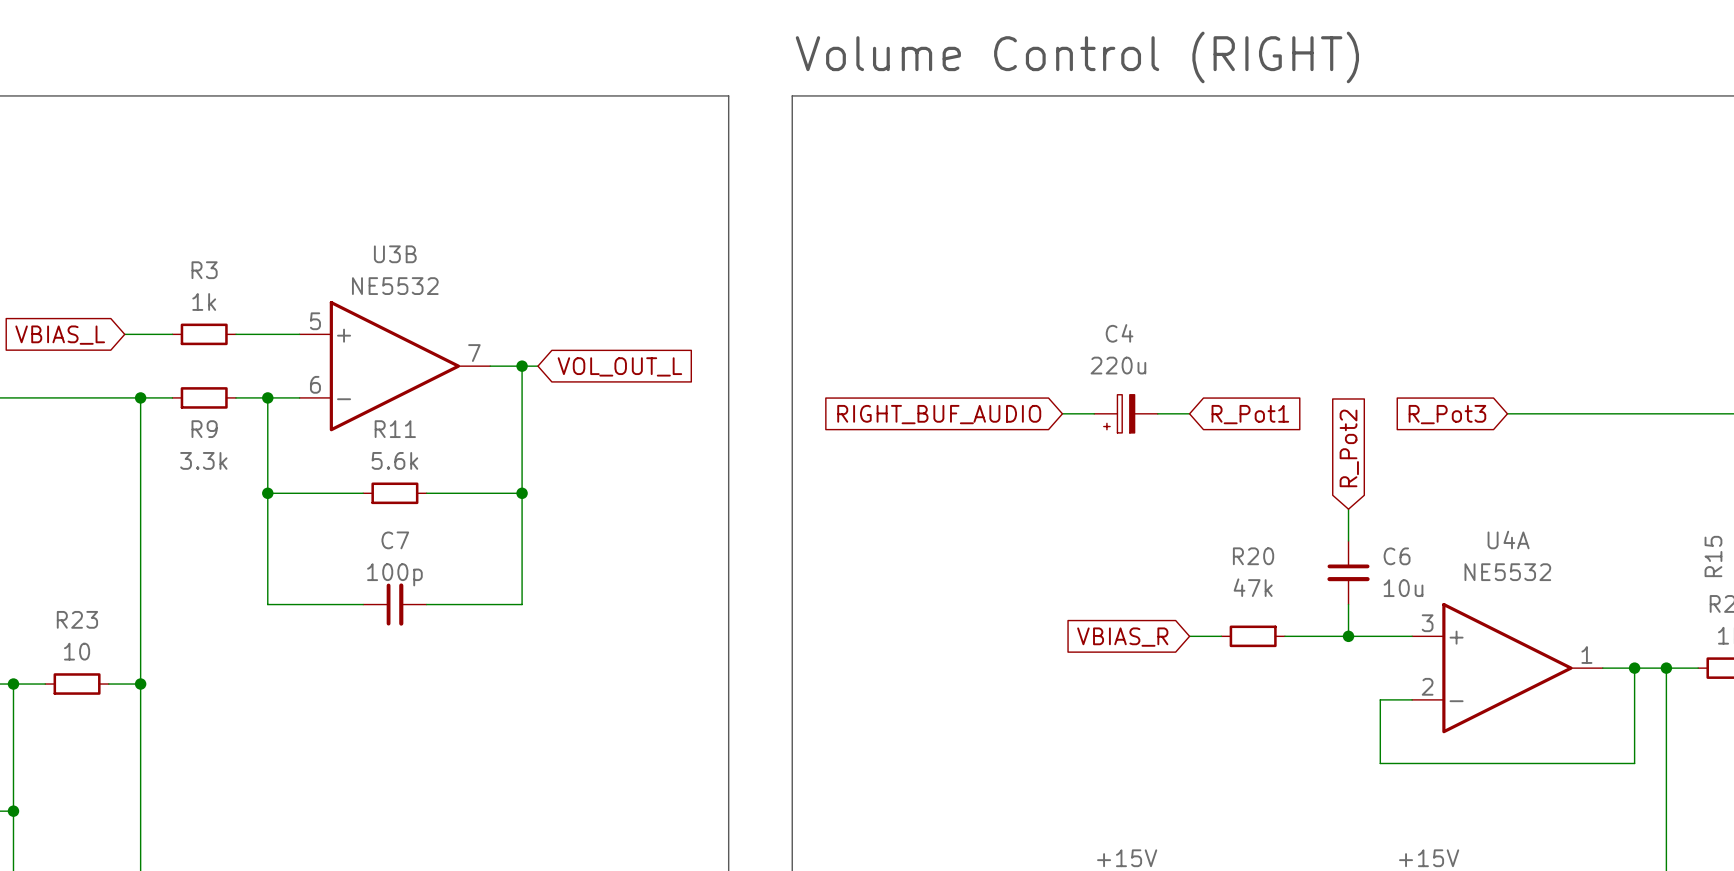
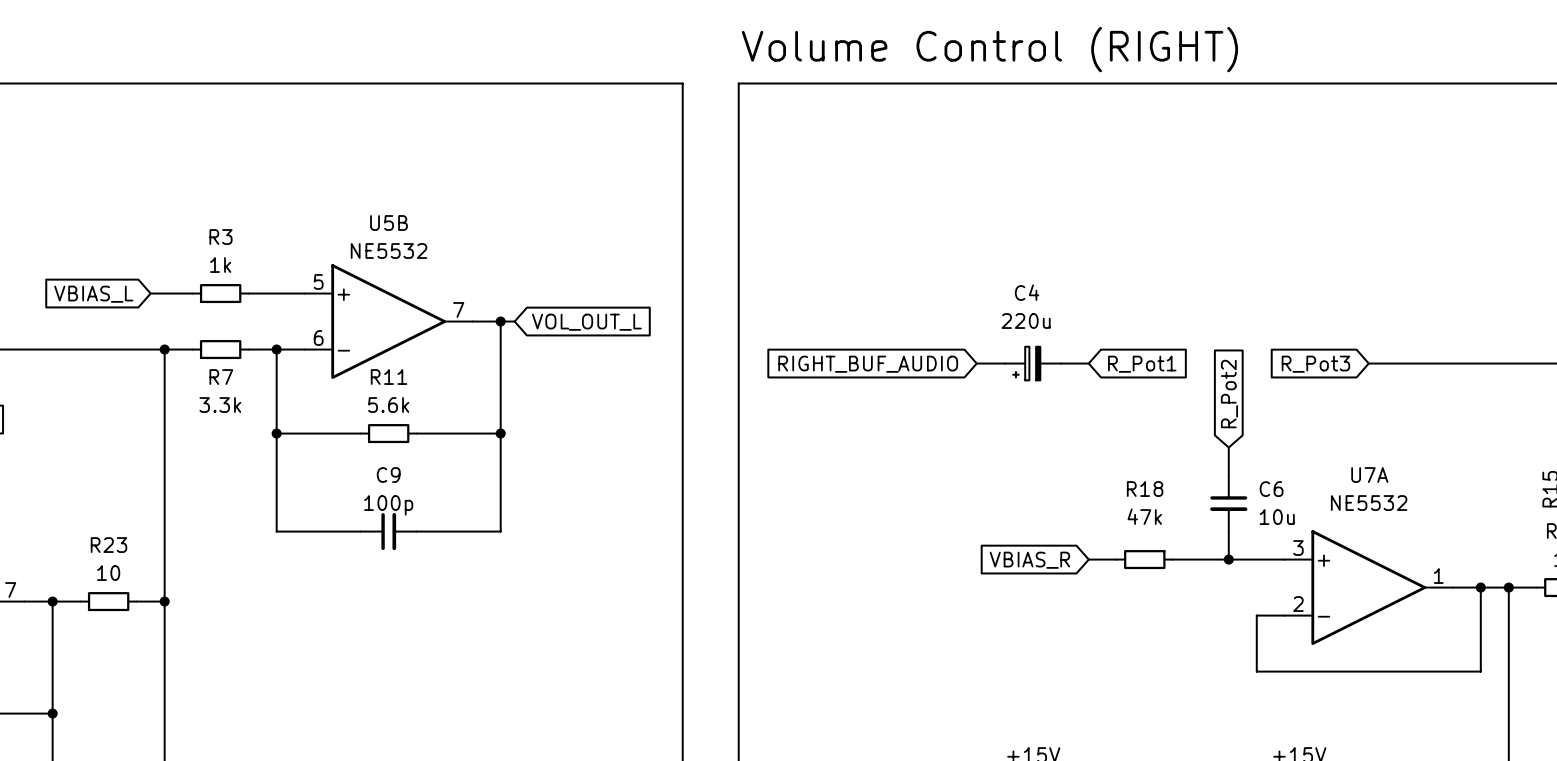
U3B name: U3B (395, 254) -> U5B (389, 223)
R9 name: R9 (204, 429) -> R7 (221, 377)
C7 name: C7 (395, 540) -> C9 (388, 475)
U4A name: U4A (1508, 540) -> U7A (1369, 475)
R20 name: R20 (1253, 556) -> R18 (1145, 489)

